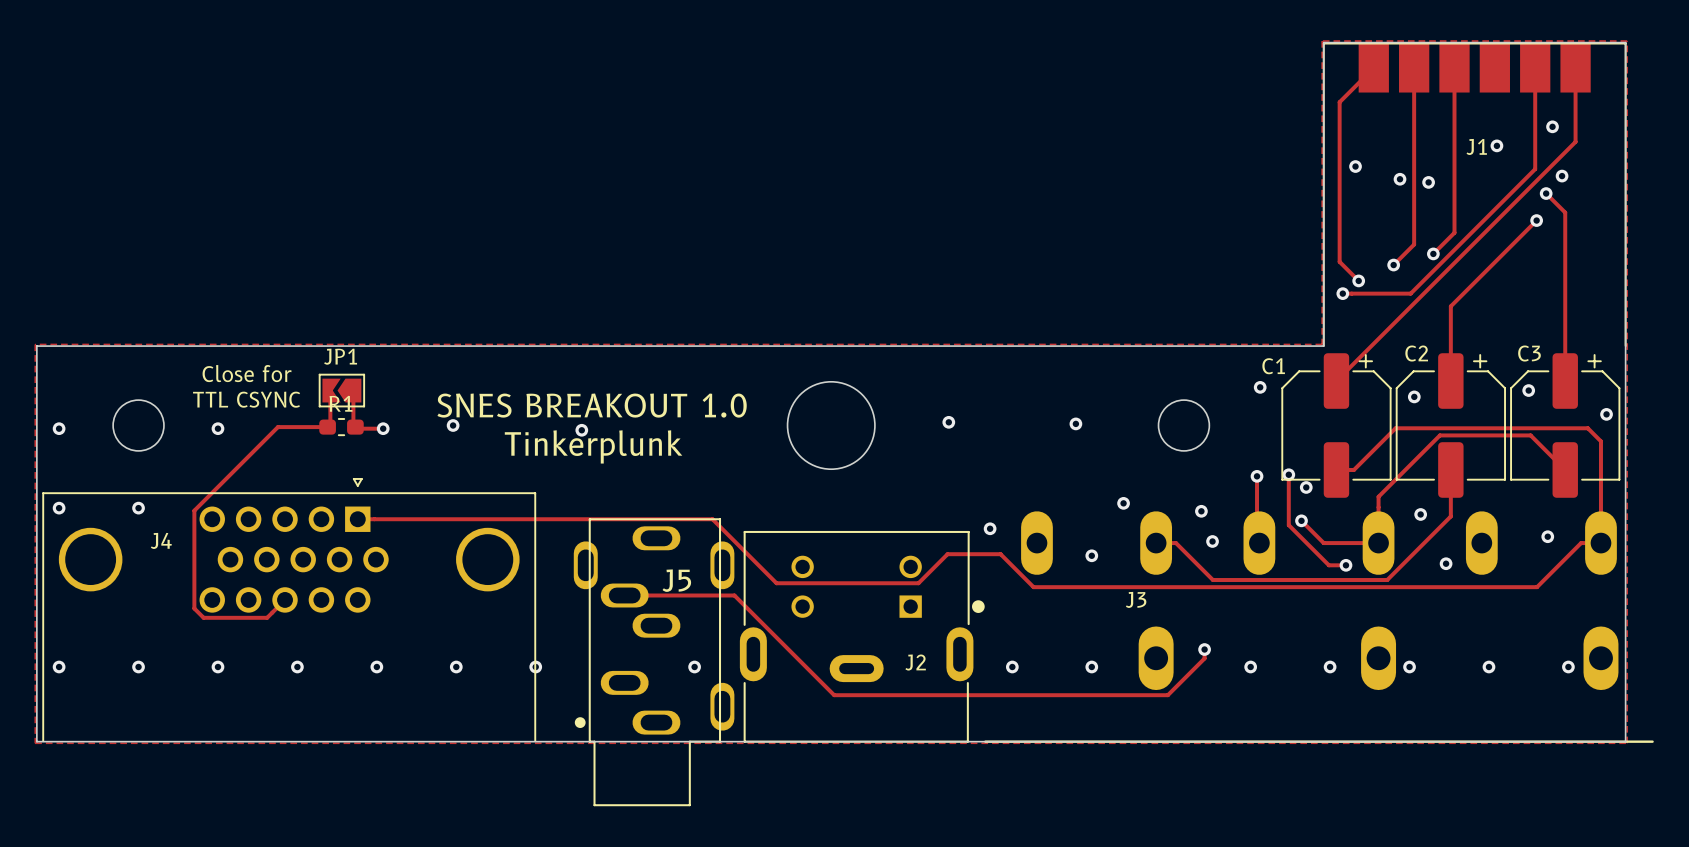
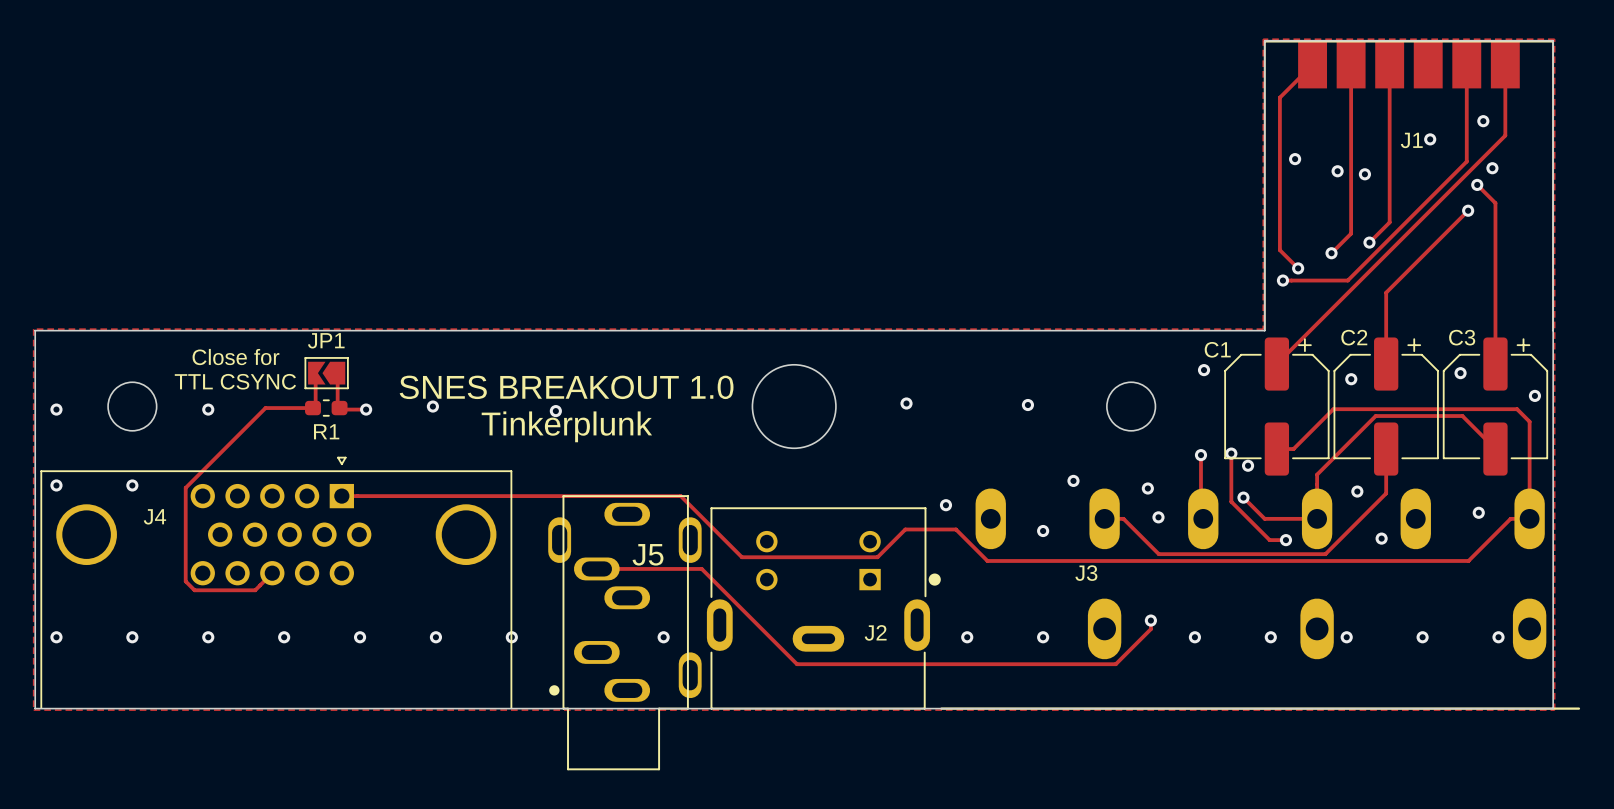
R1 name position: R1 (341, 403) -> R1 (326, 431)

